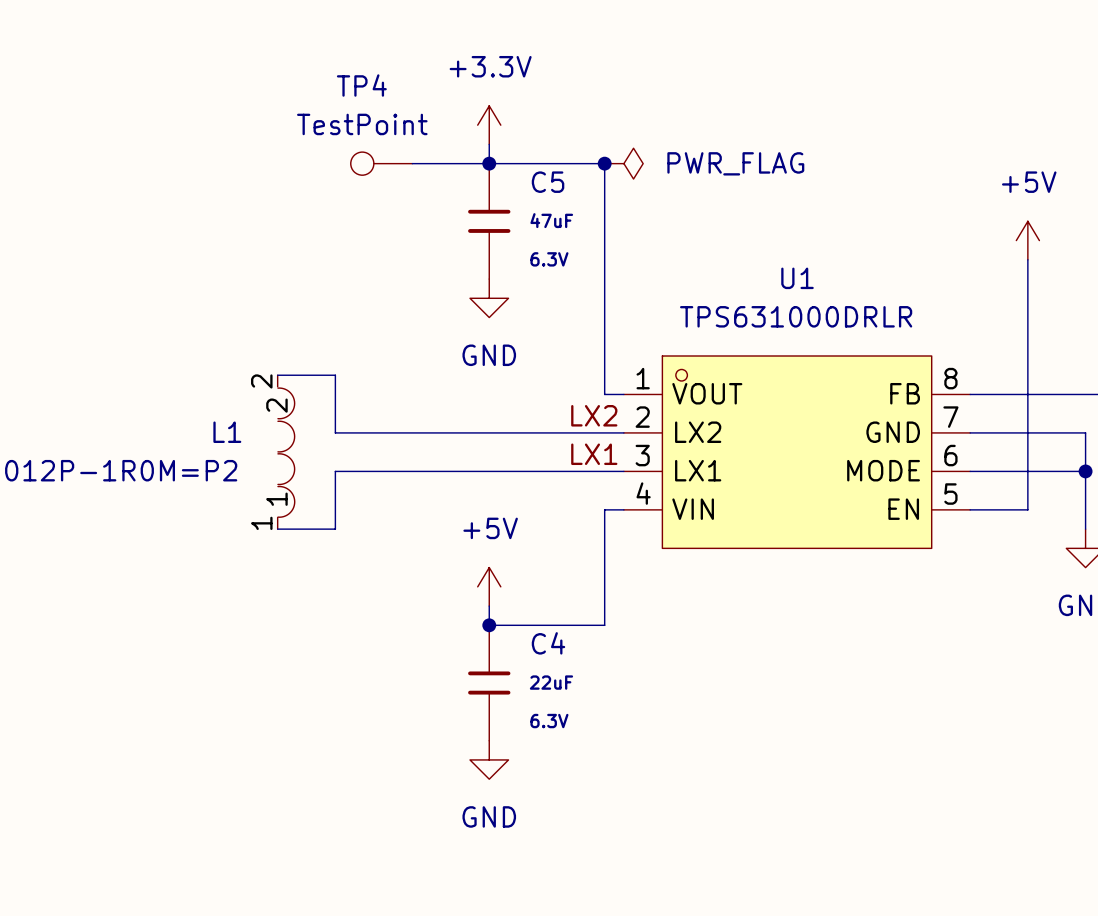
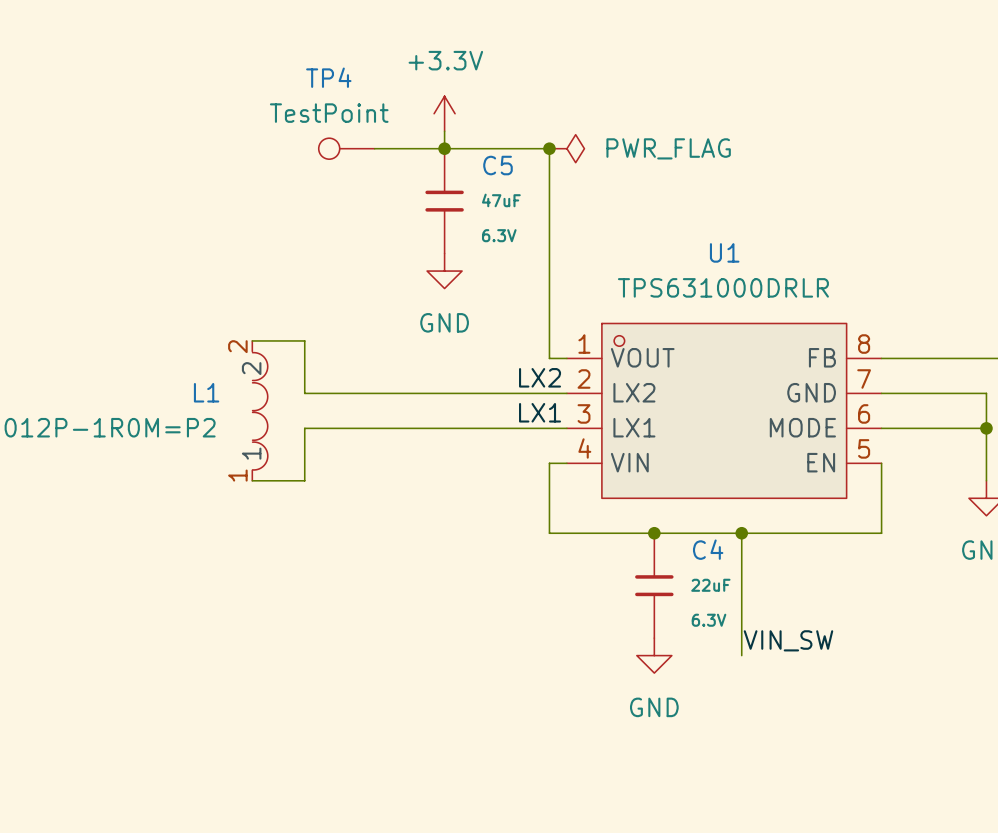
power symbol: +5V (1027, 240) -> none
wire: (1027, 259) (1027, 509) (970, 509) -> none
power symbol: +5V (489, 586) -> none
wire: (604, 586) (604, 625) (489, 625) (489, 606) -> (549, 533) (881, 533) (881, 463)
junction: none -> (654, 533)
wire: none -> (741, 533) (741, 655)
junction: none -> (741, 533)
junction: (489, 625) -> none
C4 position: (489, 683) -> (654, 585)
label: none -> VIN_SW (788, 640)
power symbol position: GND (489, 759) -> GND (654, 655)

